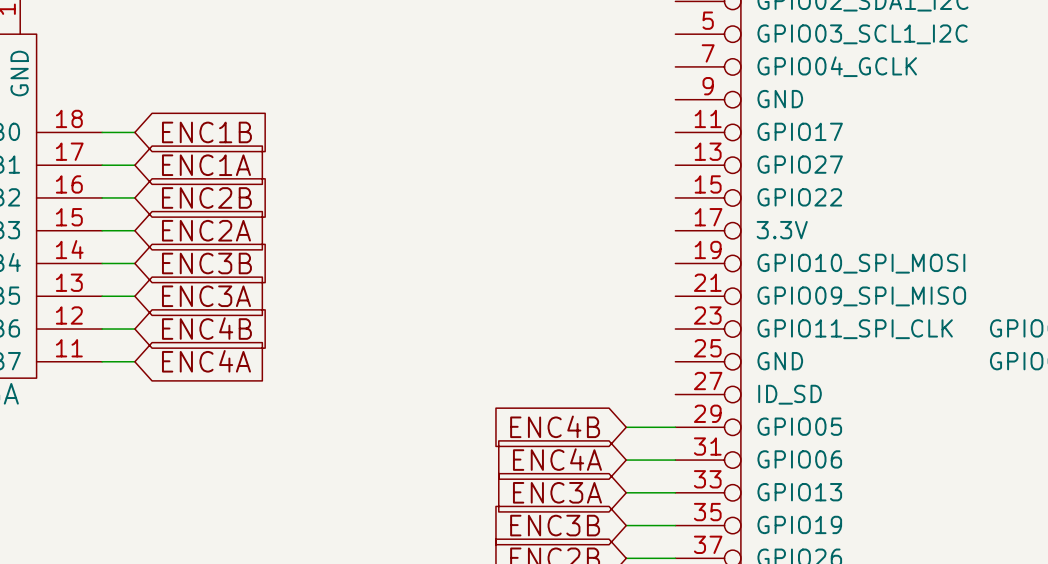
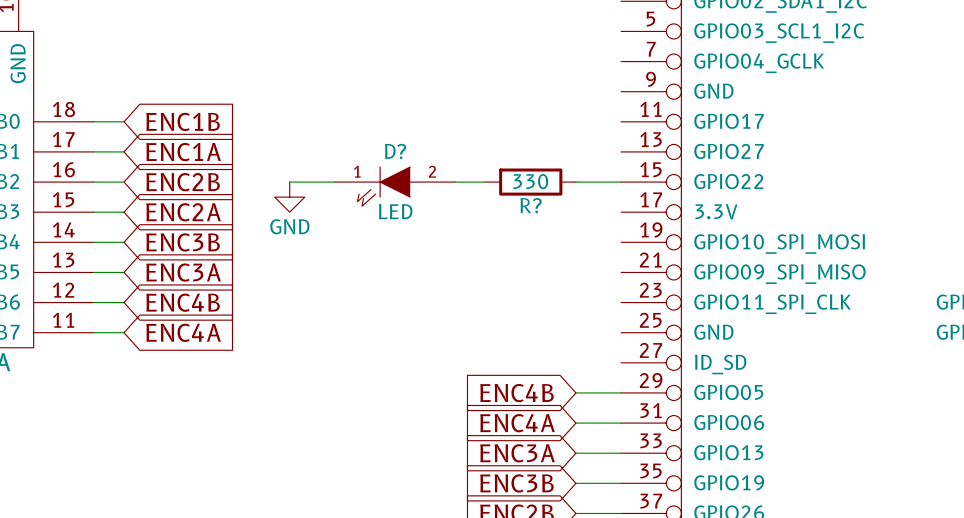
wire: none -> (289, 182) (334, 182)
wire: none -> (455, 182) (485, 182)
R?: none -> 330 (530, 182)
wire: none -> (575, 182) (621, 182)
D?: none -> LED (395, 186)
power symbol: none -> GND (289, 197)

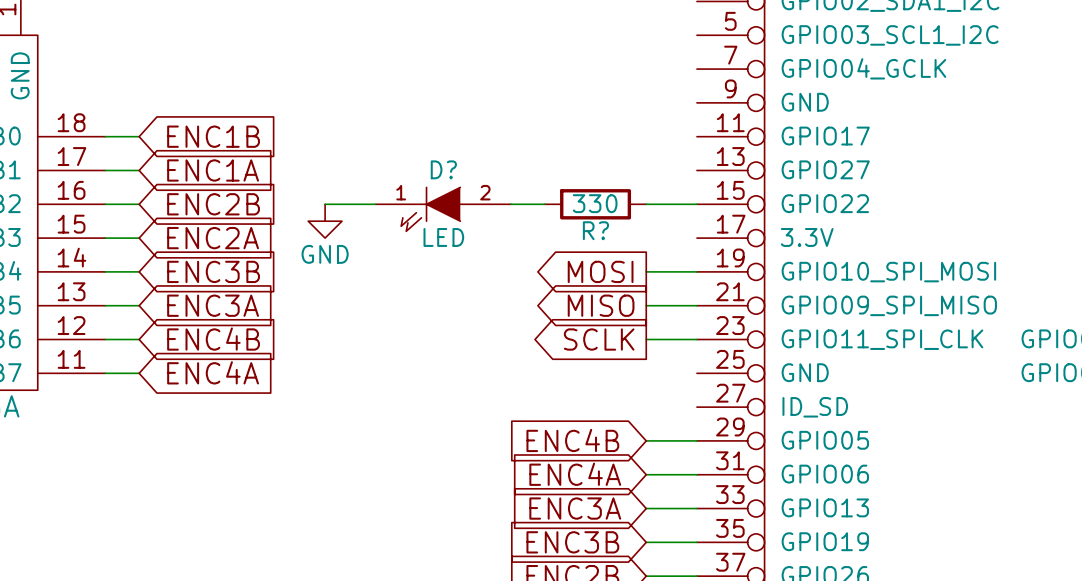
global label: none -> MOSI (600, 271)
wire: none -> (646, 271) (696, 271)
global label: none -> MISO (601, 305)
wire: none -> (646, 305) (696, 305)
global label: none -> SCLK (599, 339)
wire: none -> (646, 339) (696, 339)

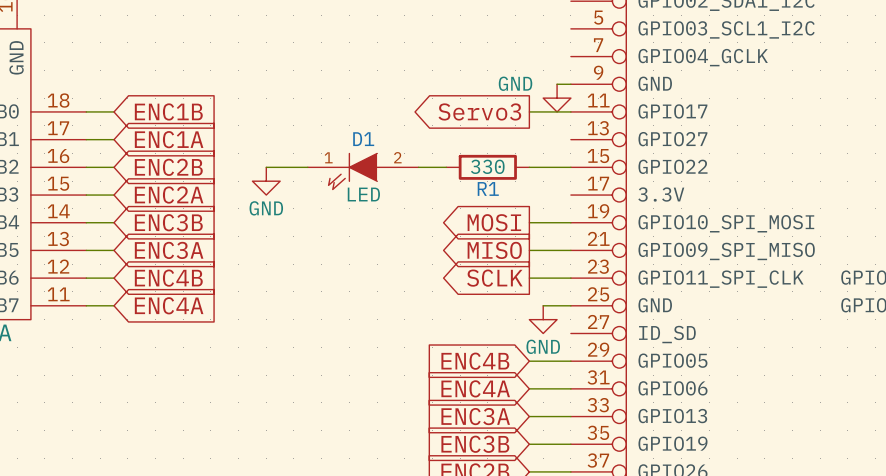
wire: none -> (557, 84) (570, 84)
power symbol: none -> GND (557, 98)
global label: none -> Servo3 (479, 111)
wire: none -> (529, 111) (570, 111)
D? name: D? (443, 169) -> D1 (363, 139)
R? name: R? (595, 230) -> R1 (488, 188)
wire: none -> (543, 305) (570, 305)
power symbol: none -> GND (543, 319)

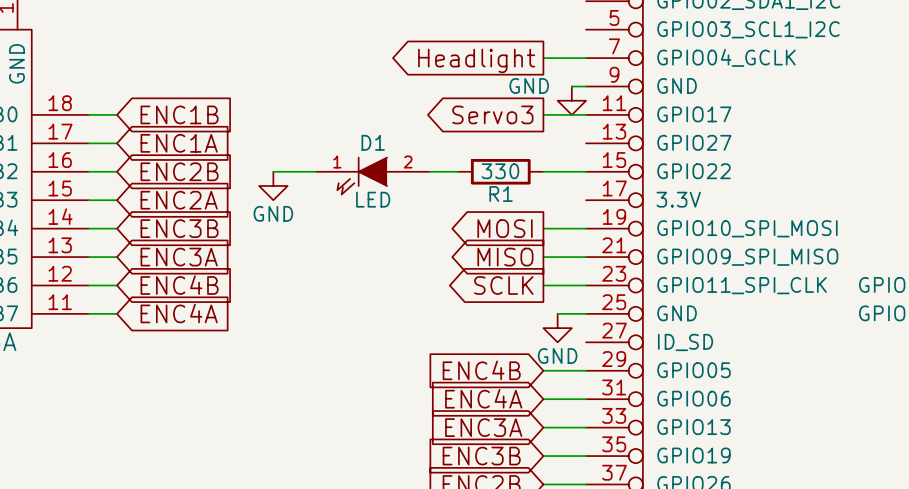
wire: none -> (543, 58) (586, 58)
global label: none -> Headlight (476, 60)

